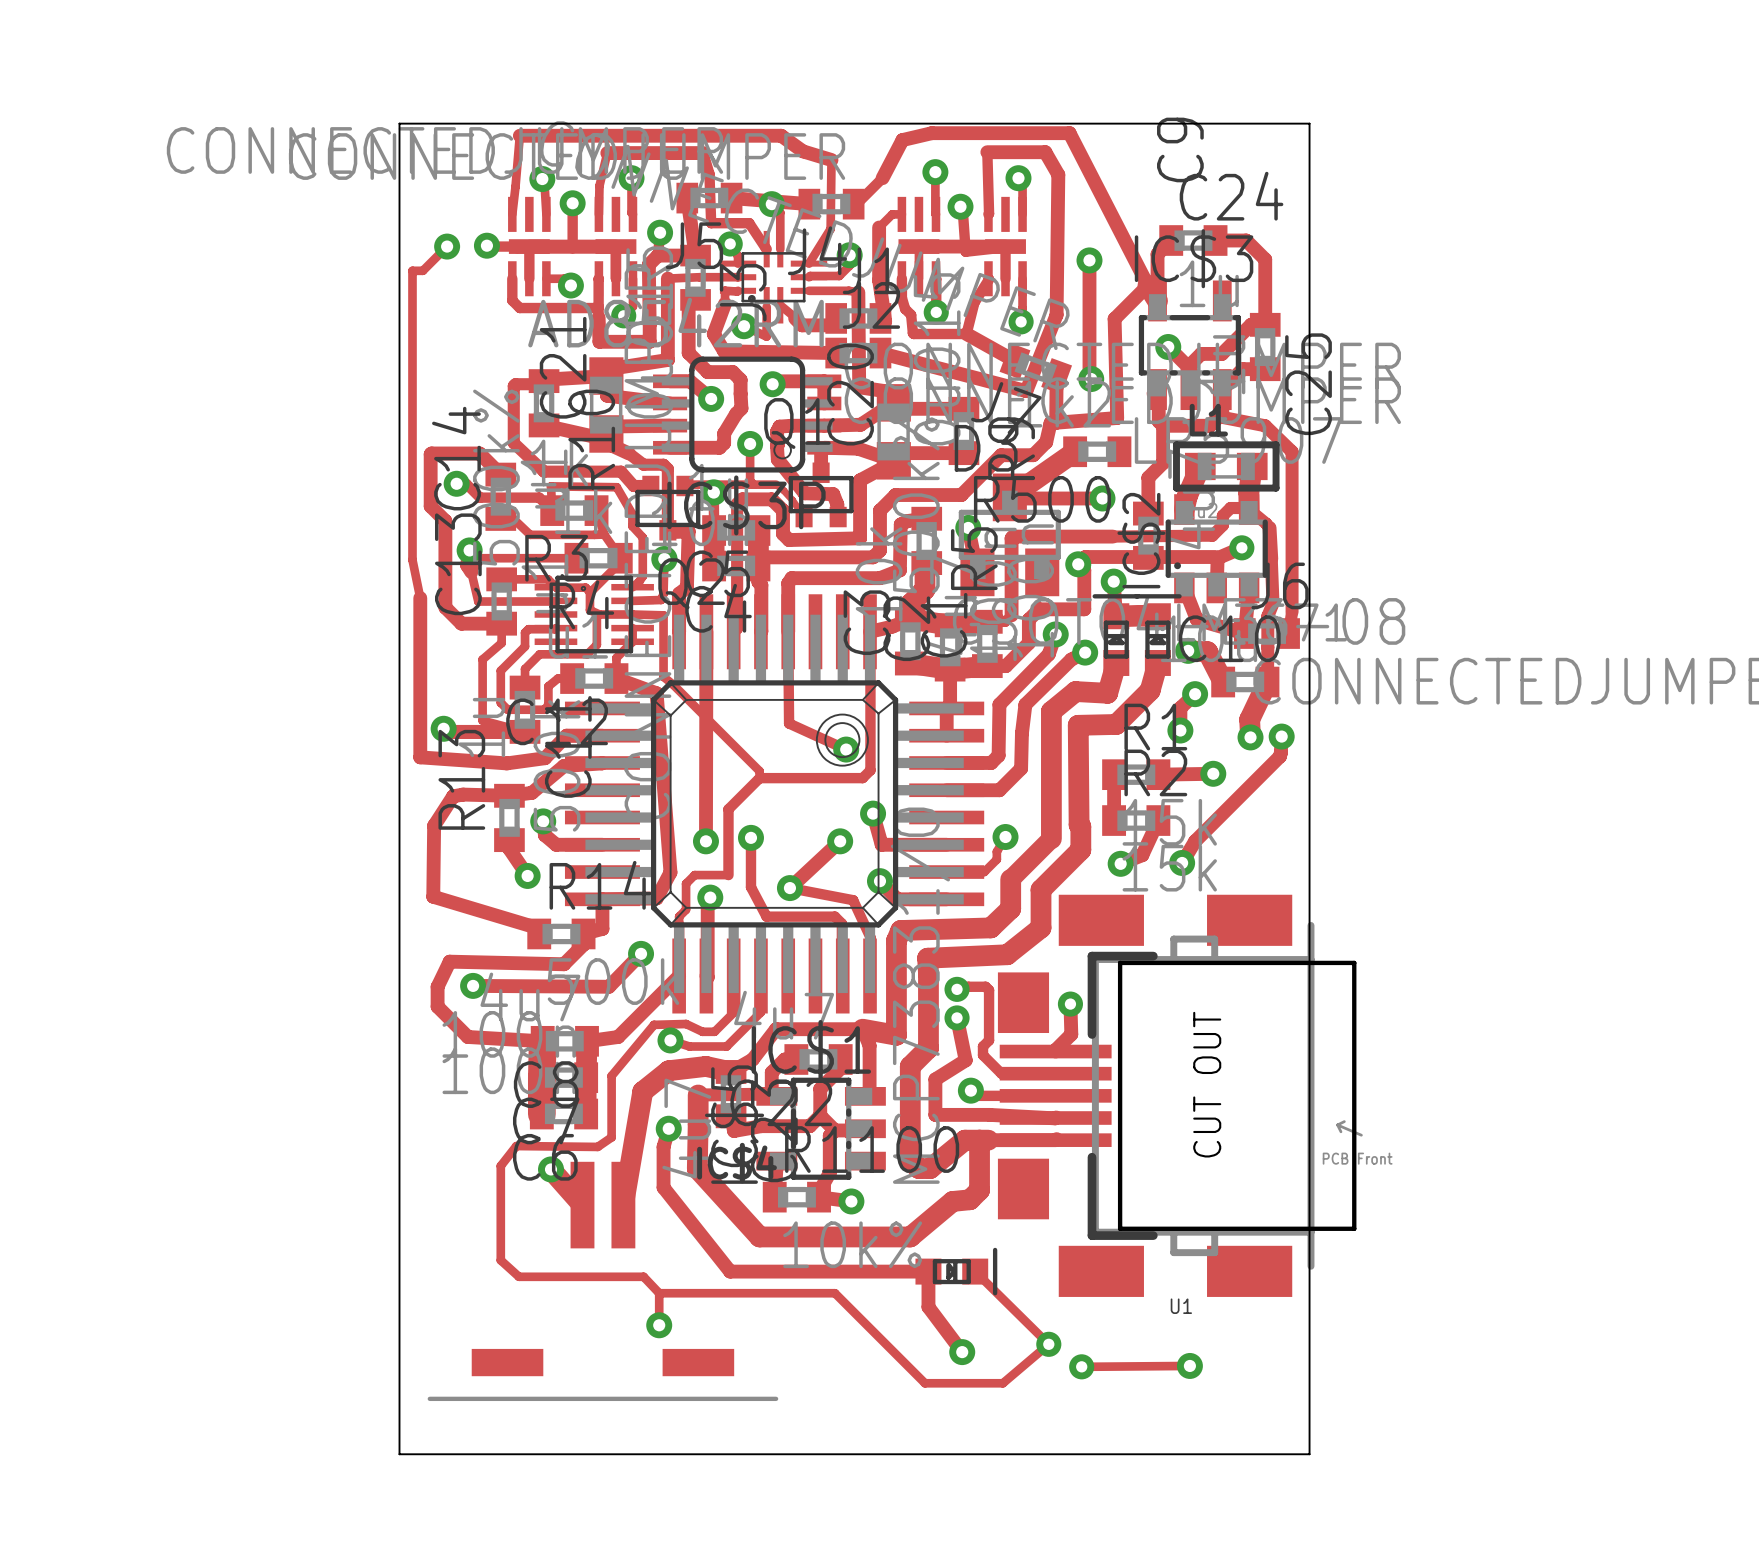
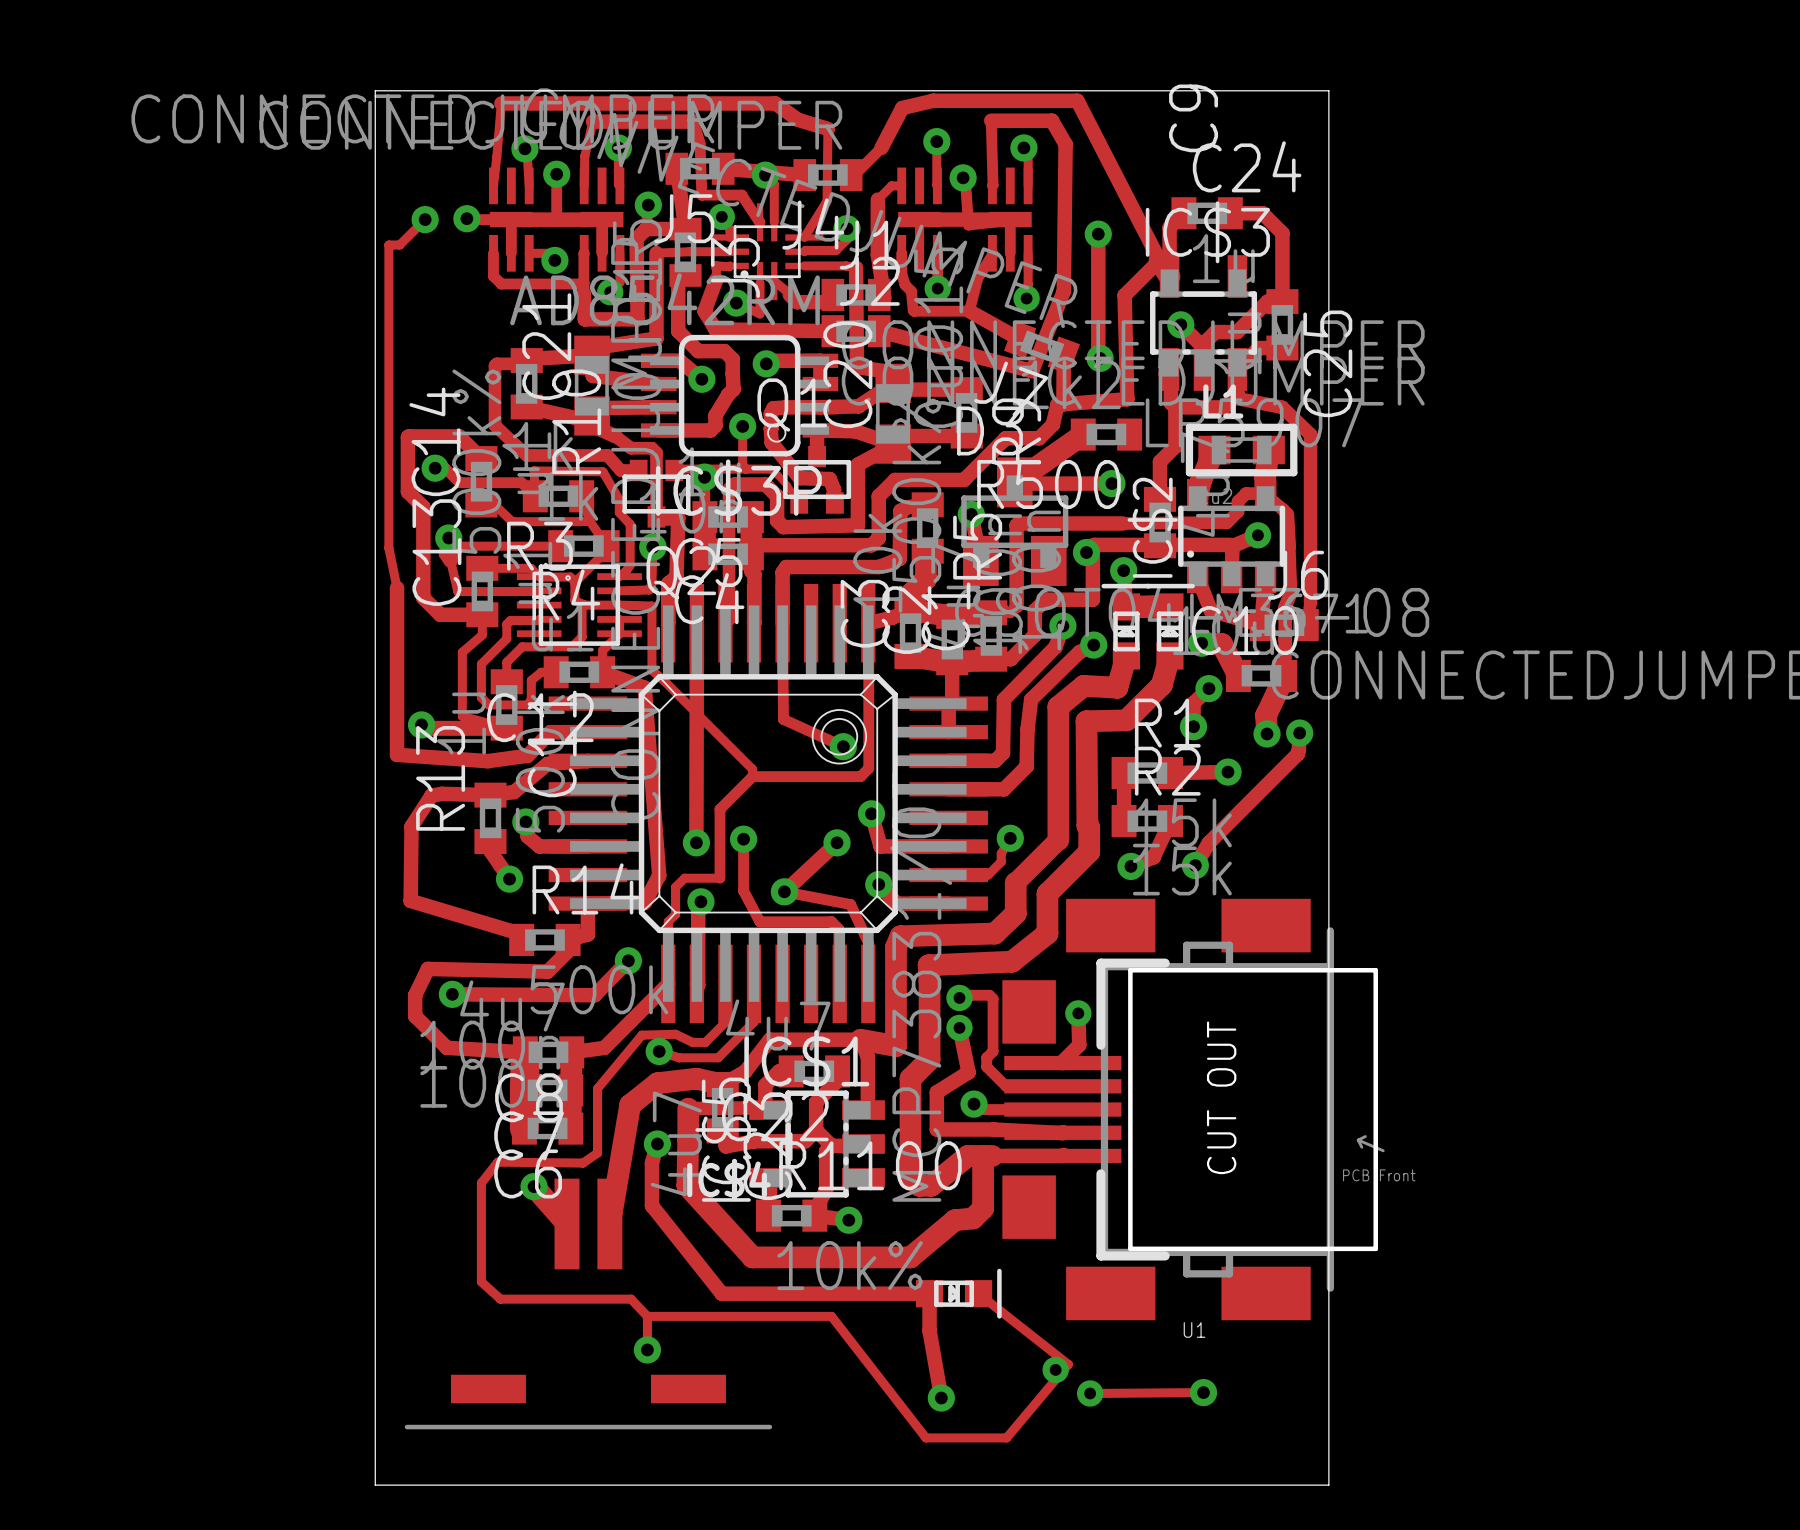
track: (975, 1271) (1048, 1344) (1002, 1383) (925, 1383) (834, 1293) -> (978, 1293) (1068, 1364) (1006, 1437) (925, 1437) (831, 1316)
track: (928, 1307) (962, 1352) -> (929, 1330) (941, 1398)
via position: (962, 1352) -> (941, 1398)

